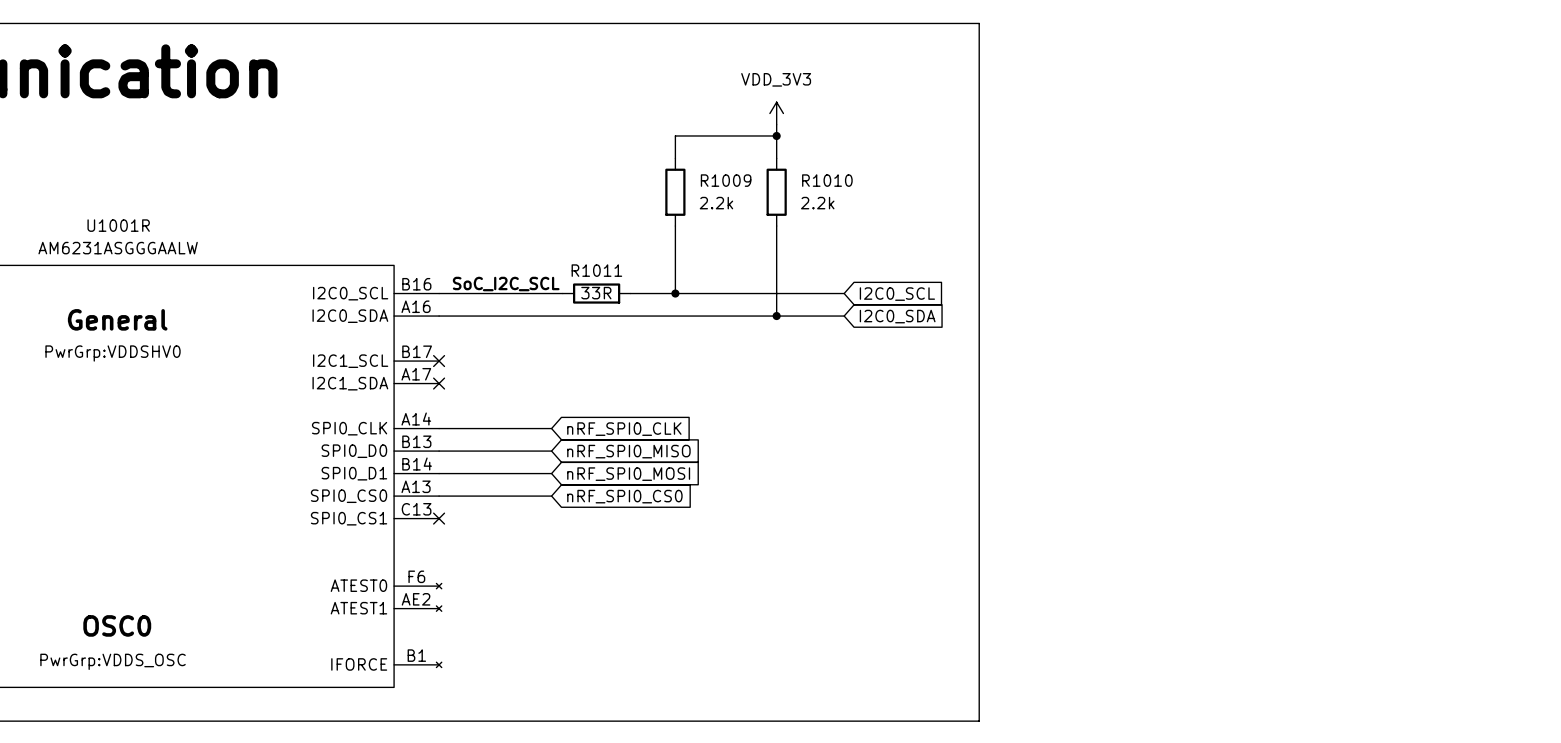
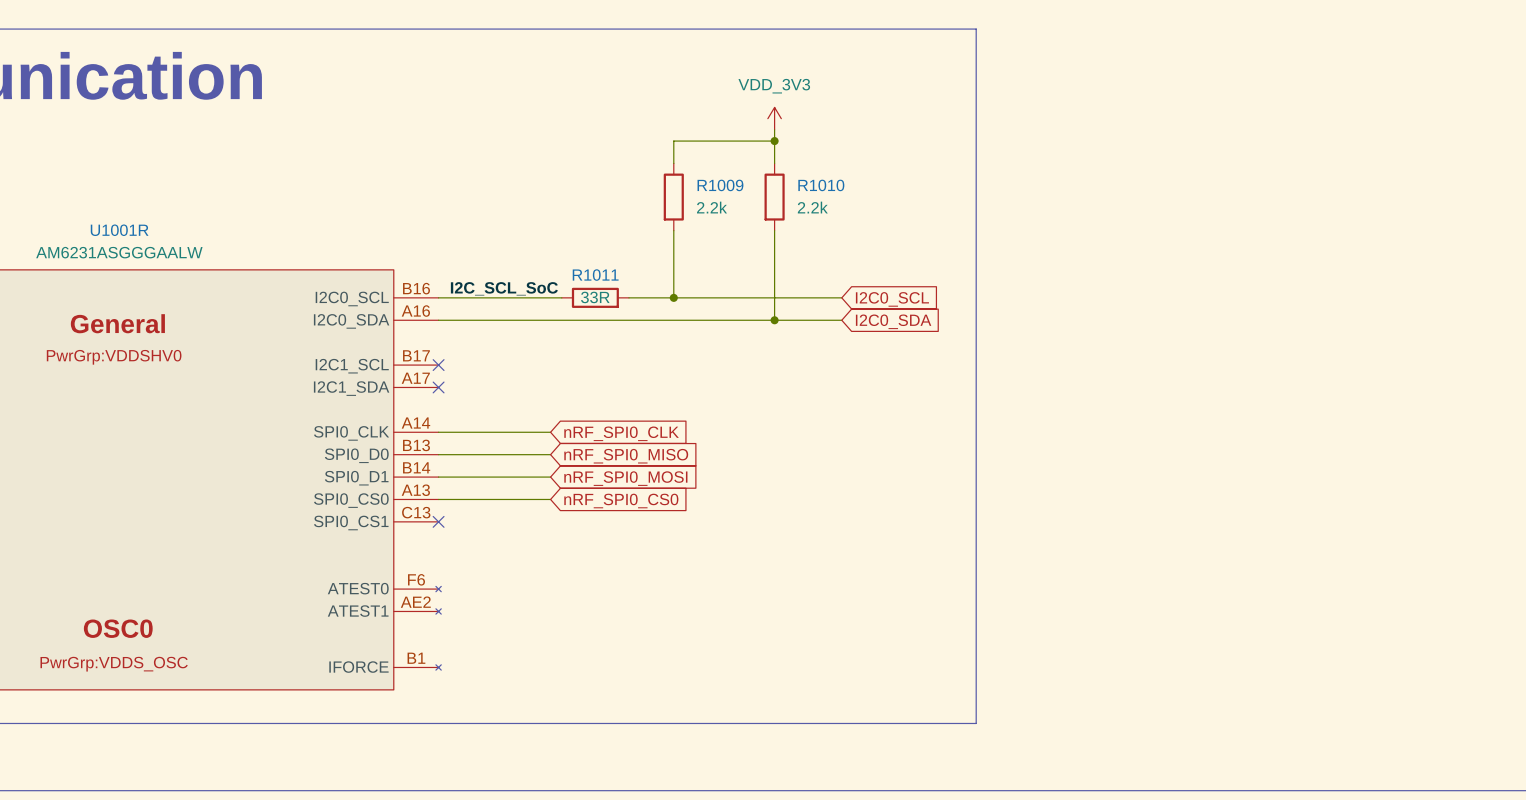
label: SoC_I2C_SCL (506, 284) -> I2C_SCL_SoC (504, 288)

